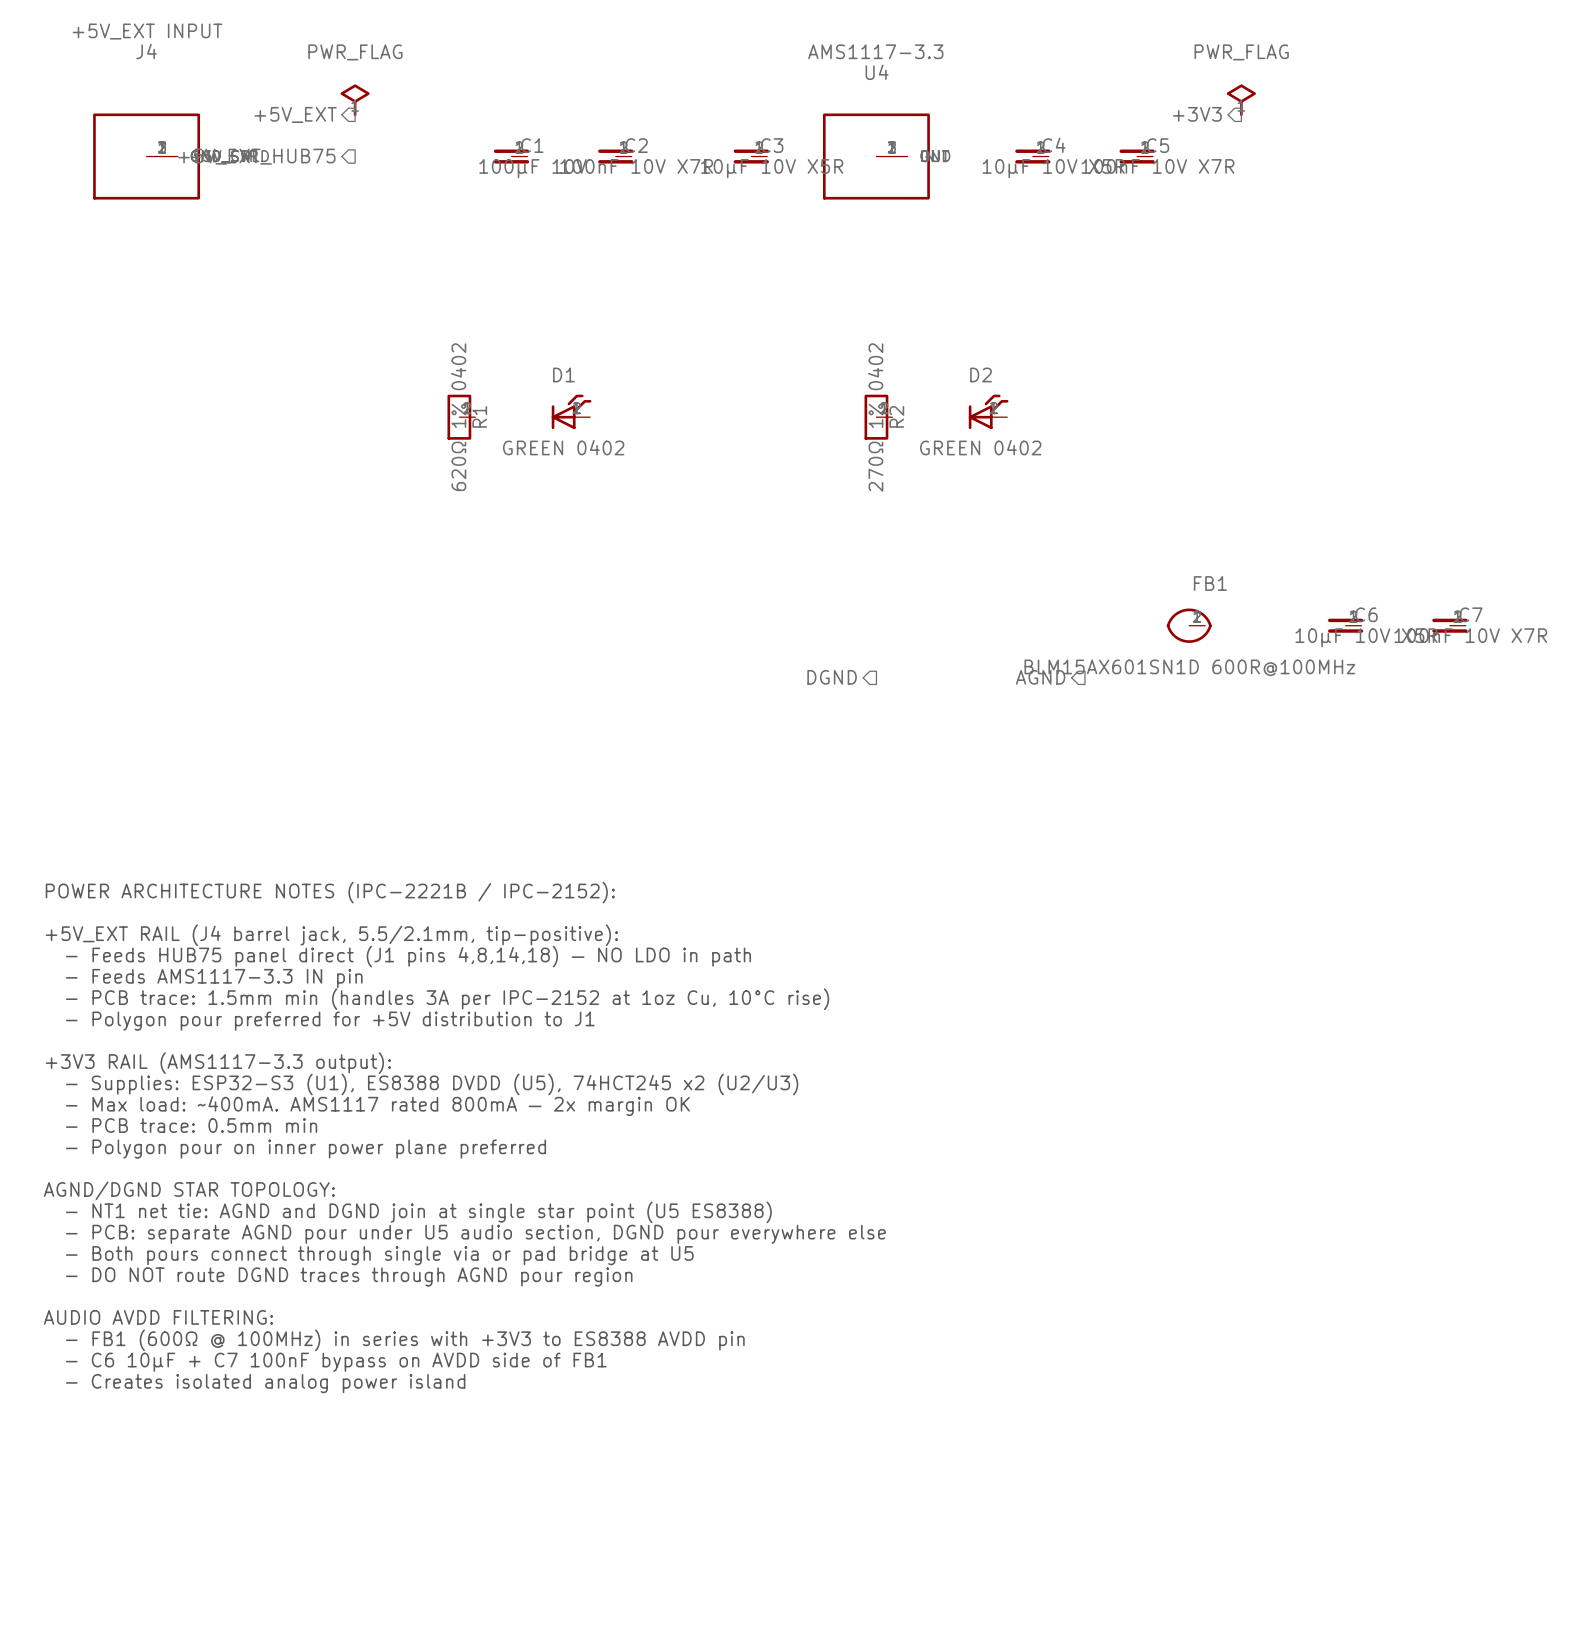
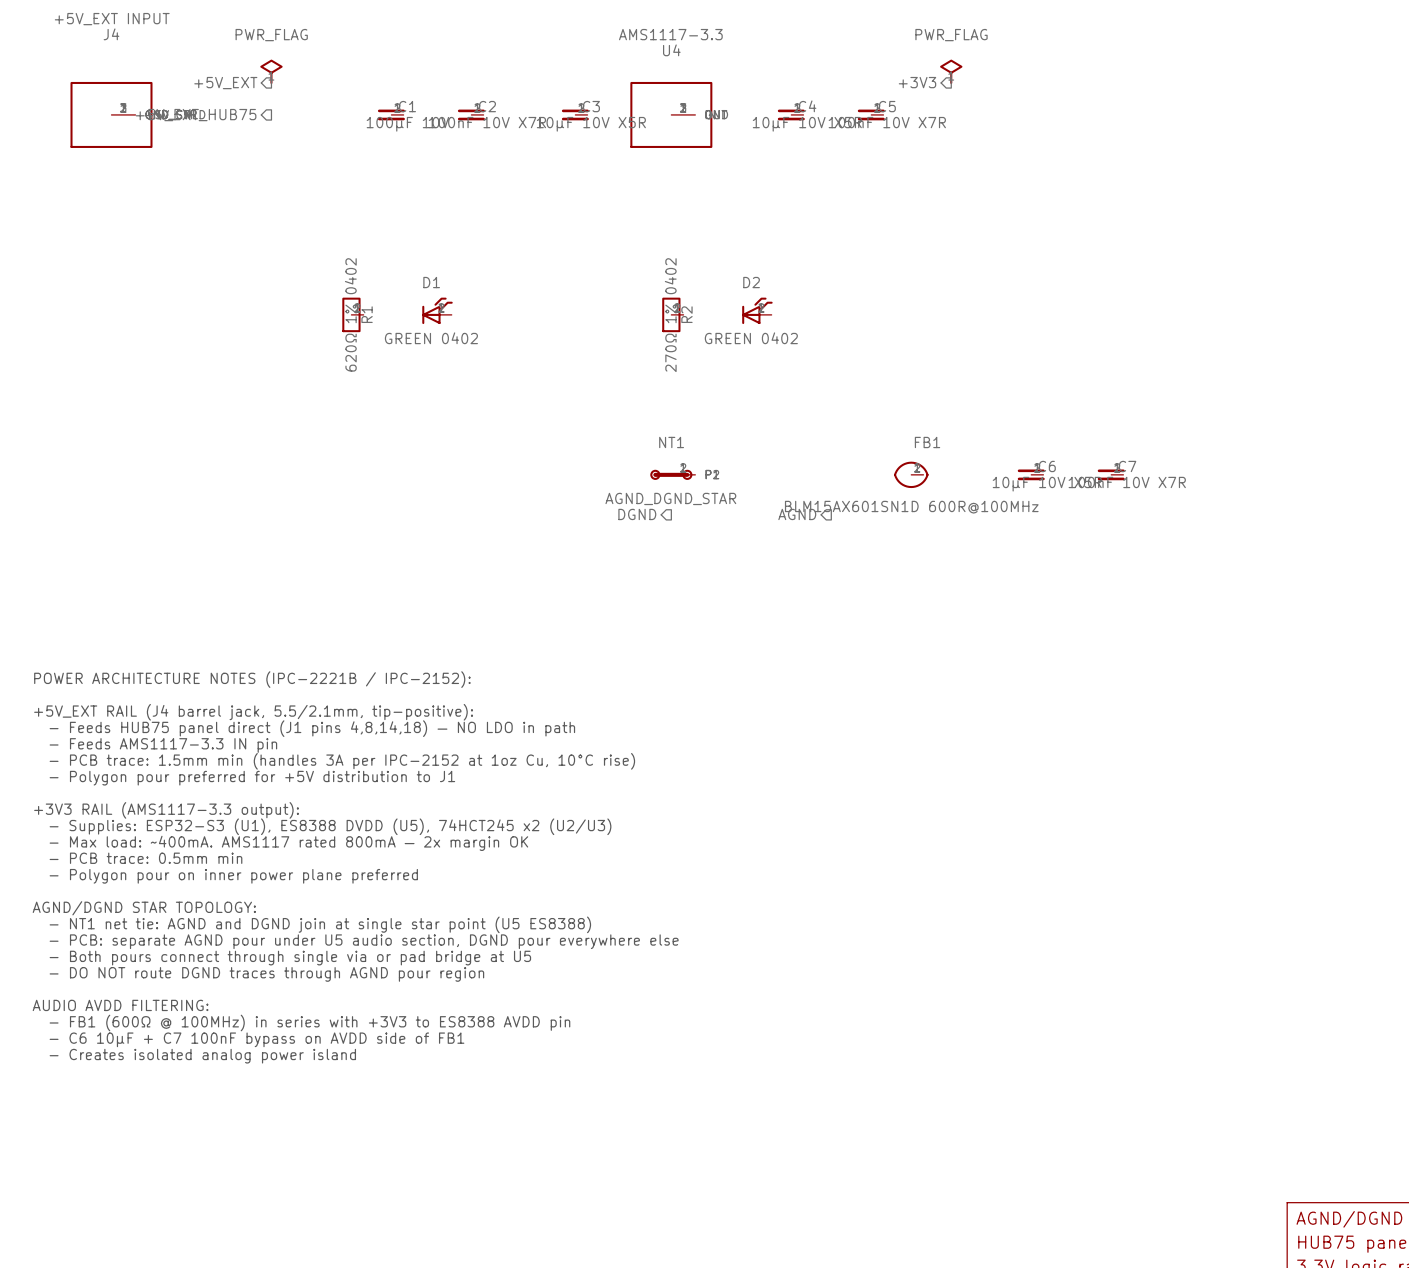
NT1: none -> AGND_DGND_STAR (672, 474)

